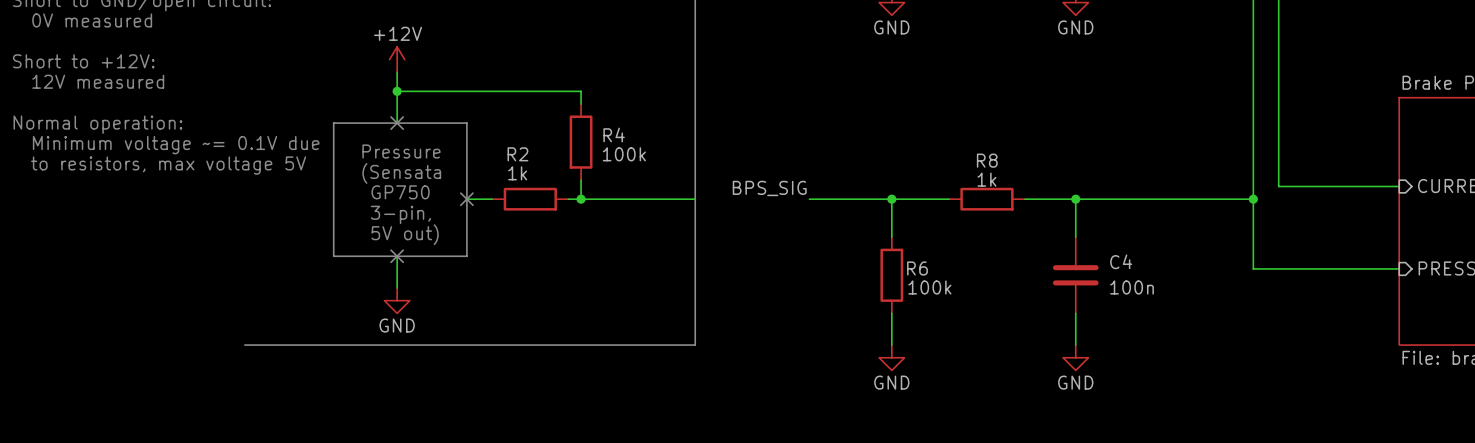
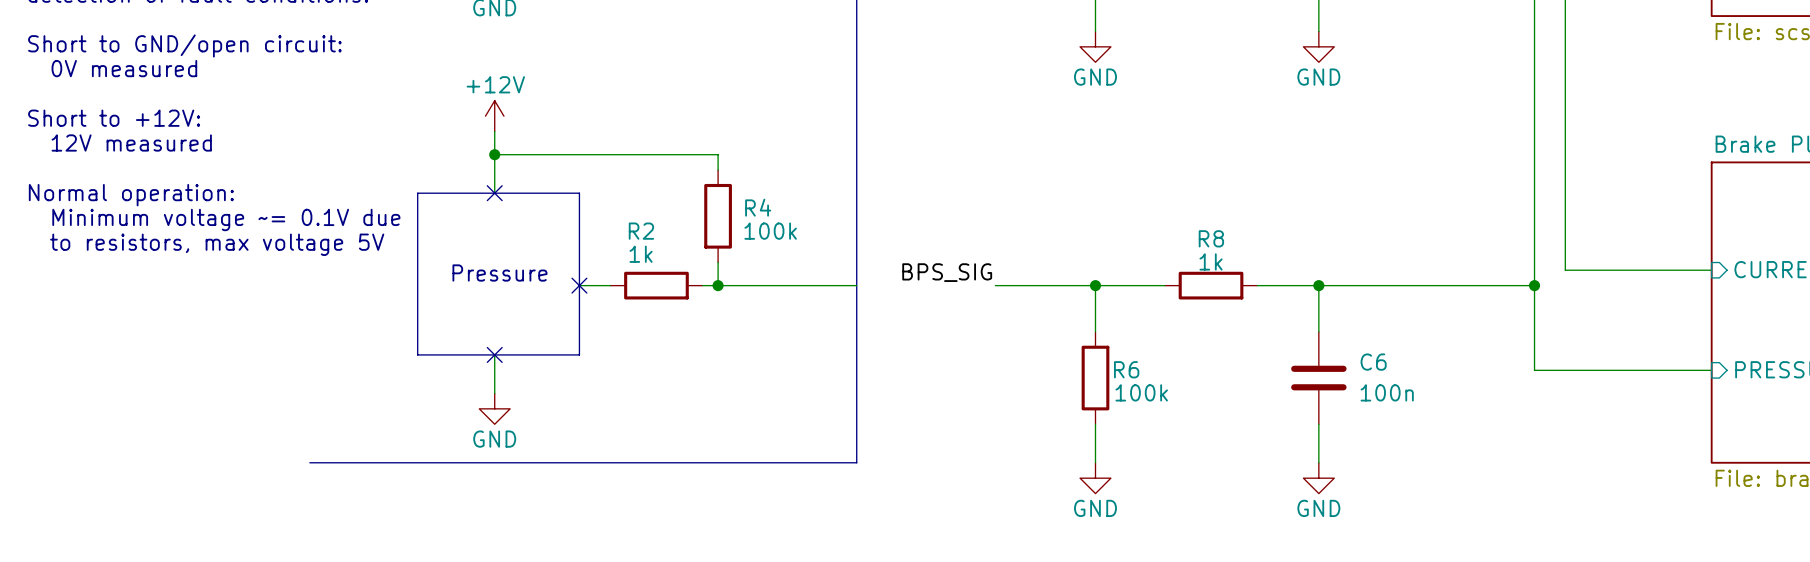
text position: Pressure (401, 151) -> Pressure (499, 273)
text: (Sensata (401, 173) -> none
text: GP750 (400, 192) -> none
text: 3-pin, (400, 214) -> none
text: 5V out) (405, 234) -> none
C4 name: C4 (1121, 261) -> C6 (1373, 362)

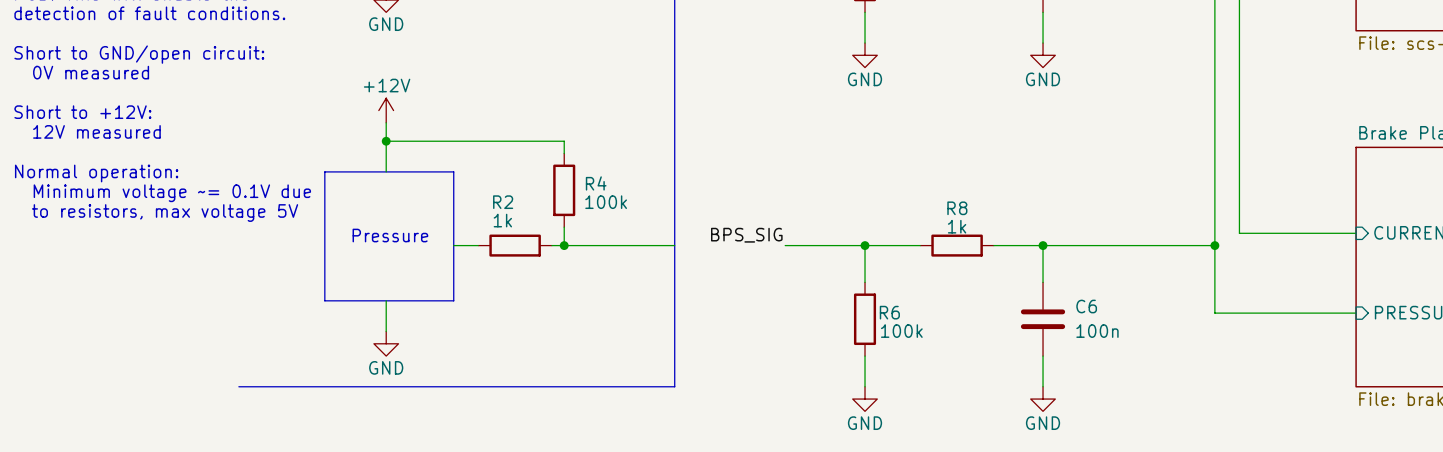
no-connect mark: (494, 193) -> none
no-connect mark: (579, 285) -> none
no-connect mark: (494, 354) -> none

